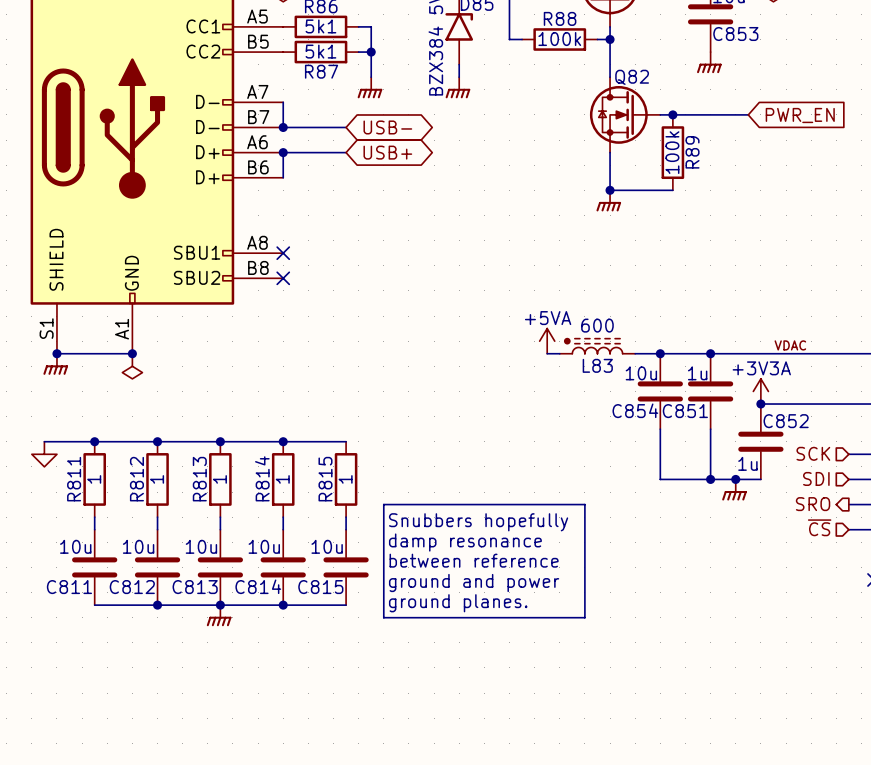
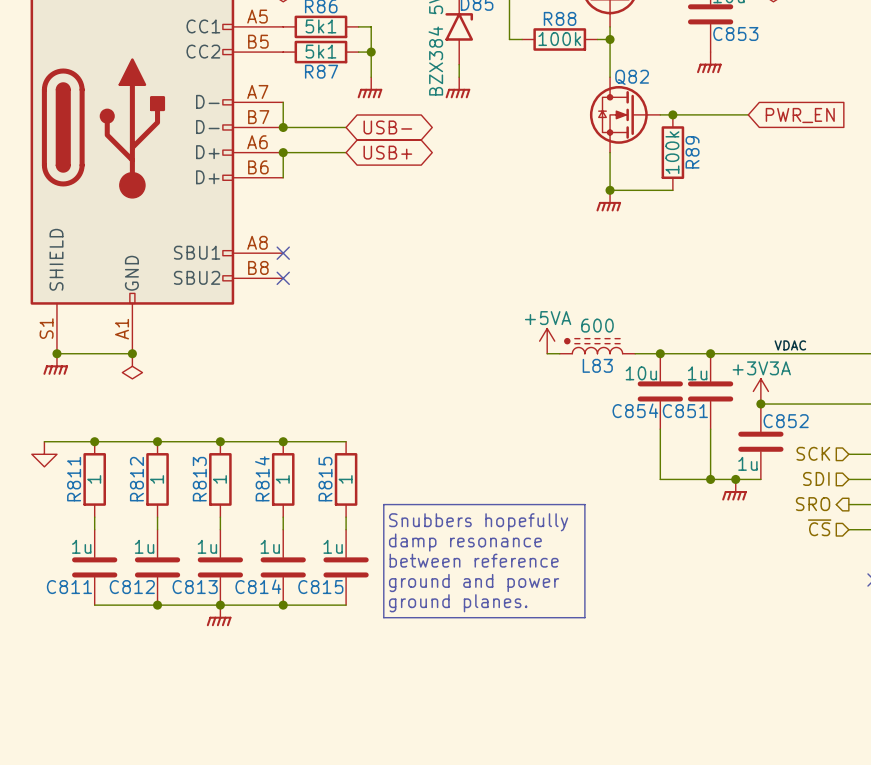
C811 value: 10u (75, 546) -> 1u (81, 546)
C812 value: 10u (138, 546) -> 1u (144, 546)
C813 value: 10u (201, 546) -> 1u (207, 546)
C814 value: 10u (264, 546) -> 1u (270, 546)
C815 value: 10u (327, 546) -> 1u (333, 546)

